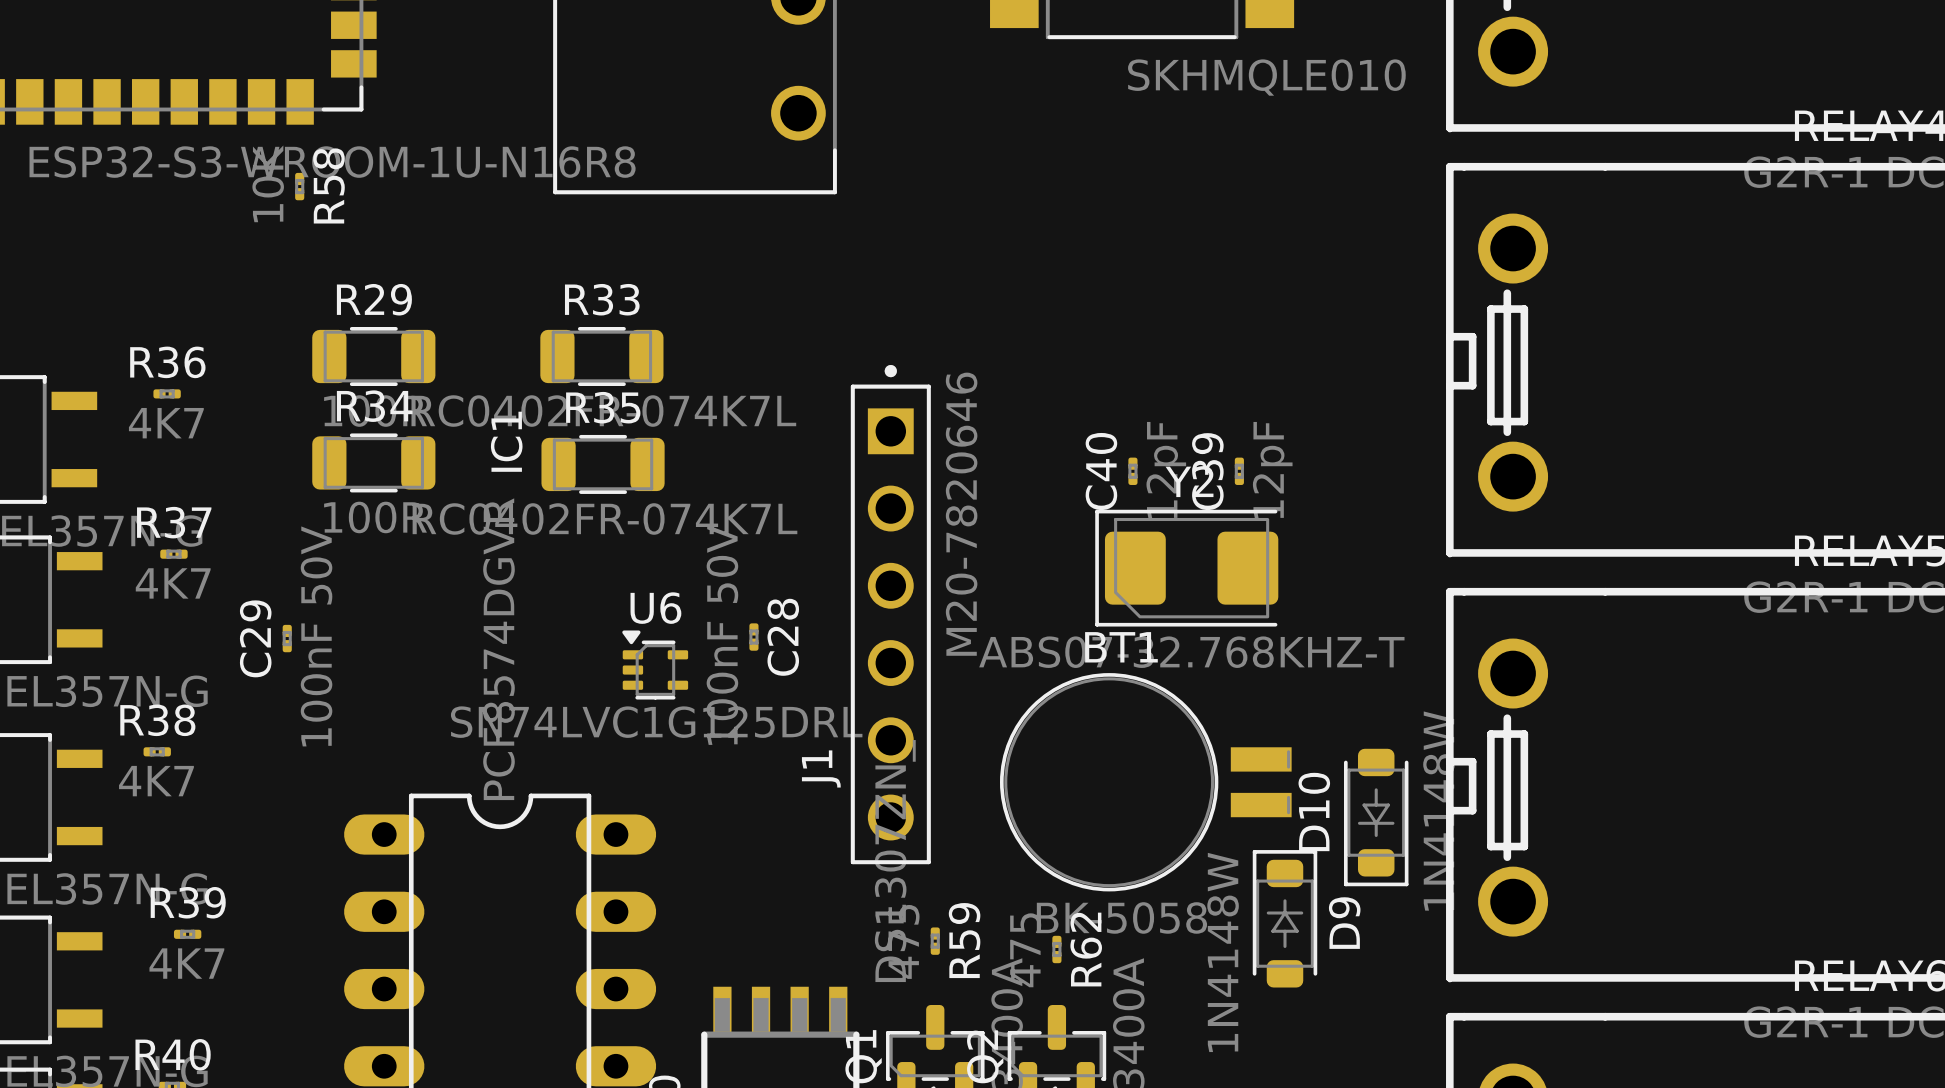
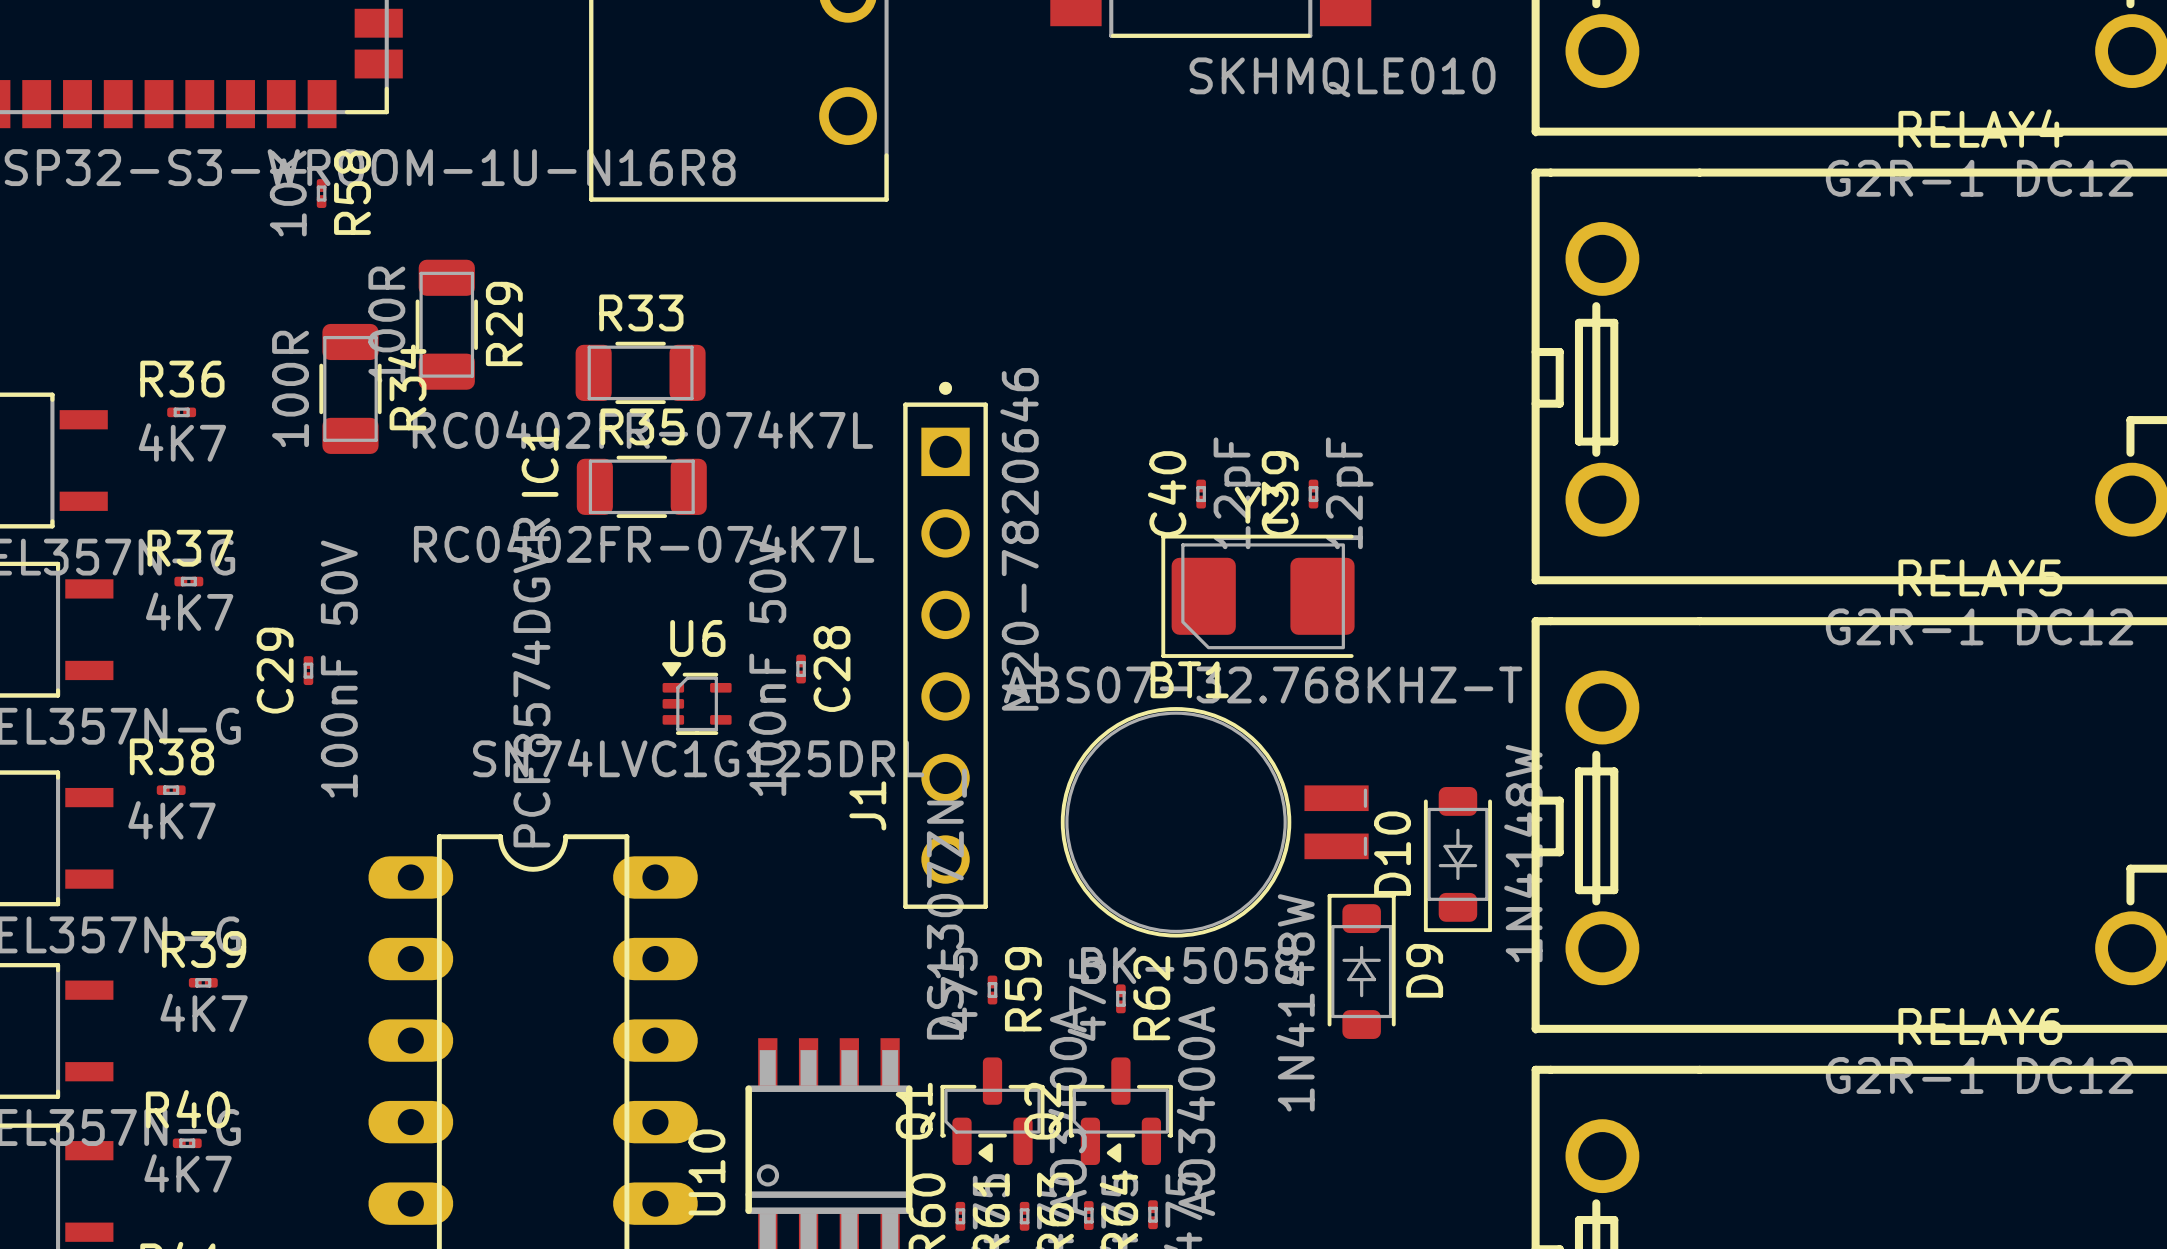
R29 rotation: 0° (373, 356) -> 90° clockwise (446, 324)
R34 rotation: 0° (373, 462) -> 90° clockwise (350, 388)
R34 position: (373, 462) -> (350, 388)

